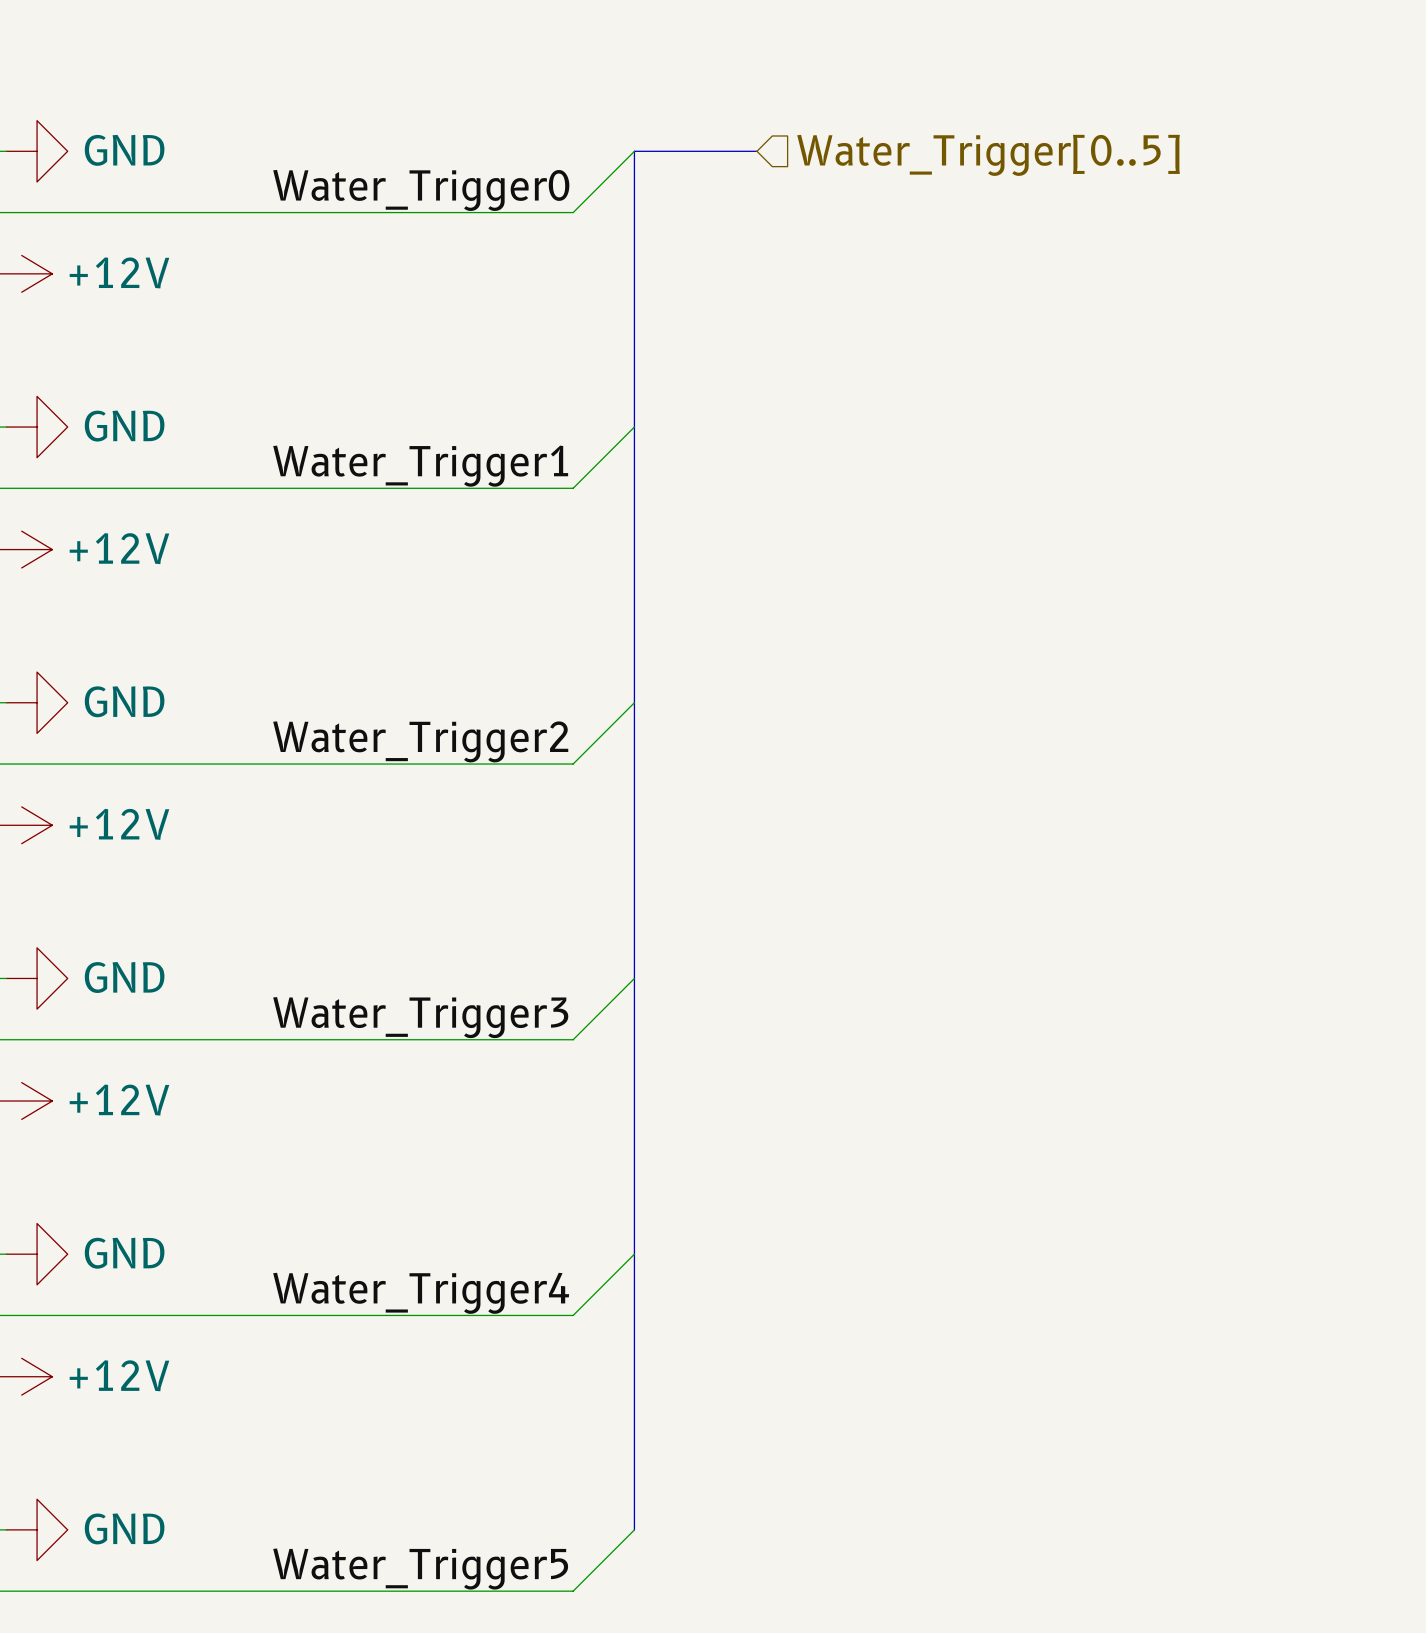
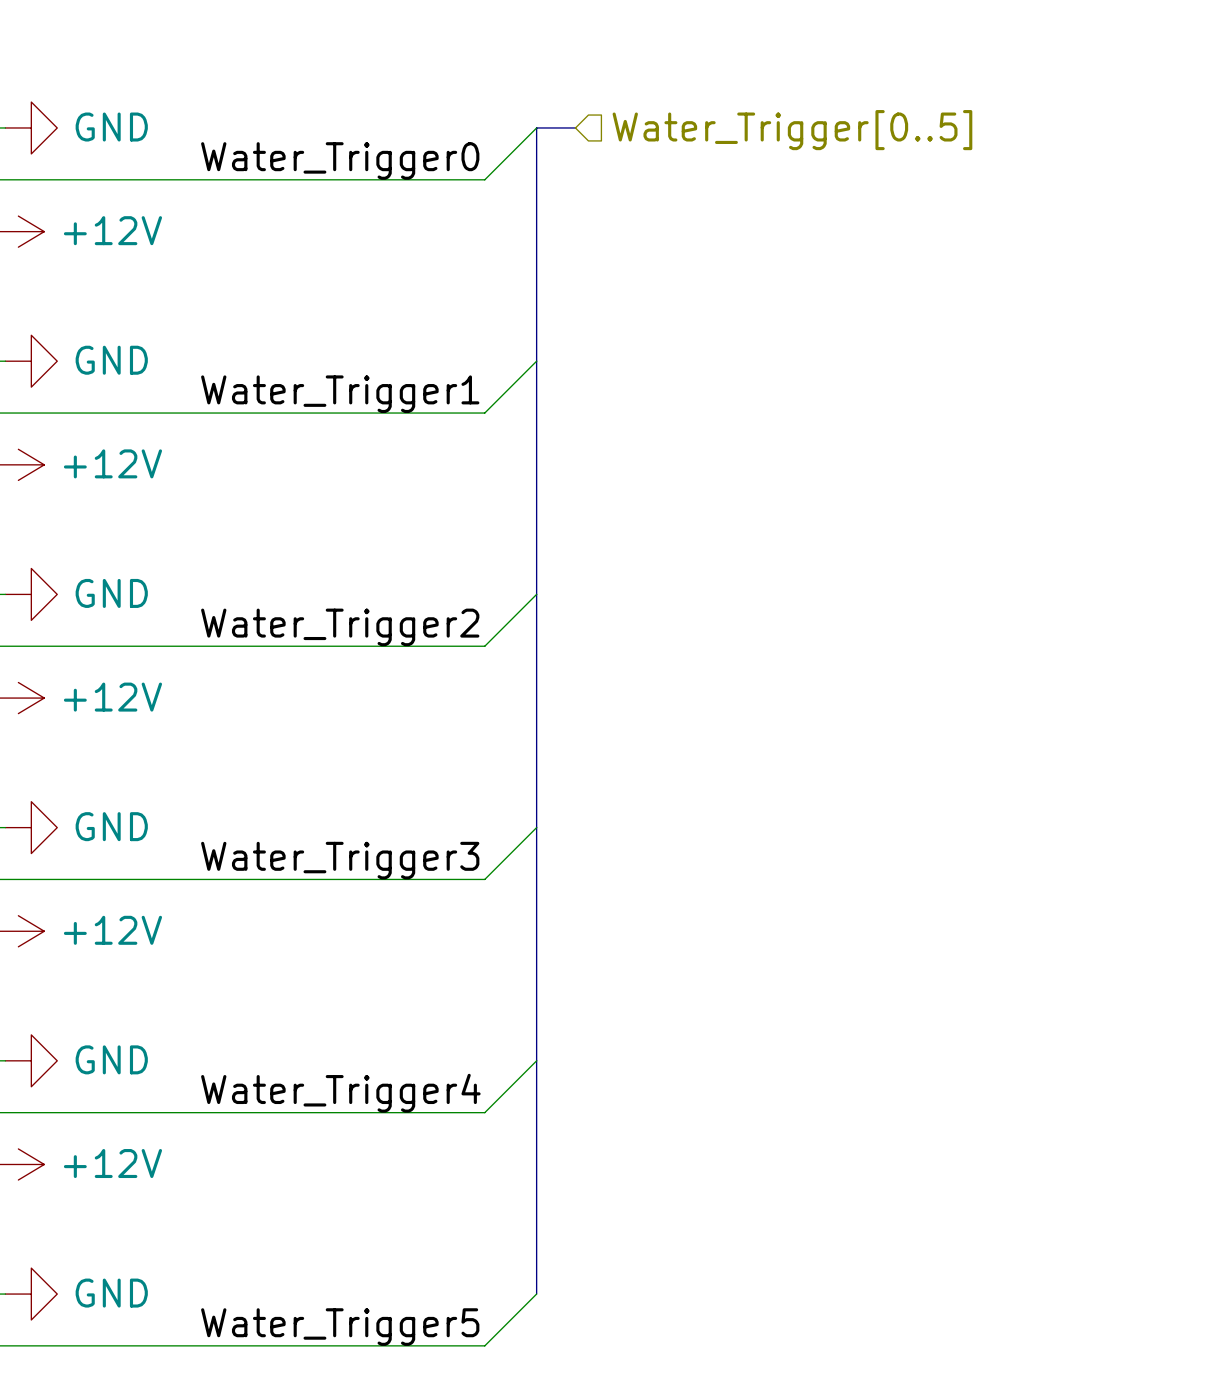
bus: (680, 151) (756, 151) -> none
hierarchical label position: Water_Trigger[0..5] (988, 155) -> Water_Trigger[0..5] (792, 130)

